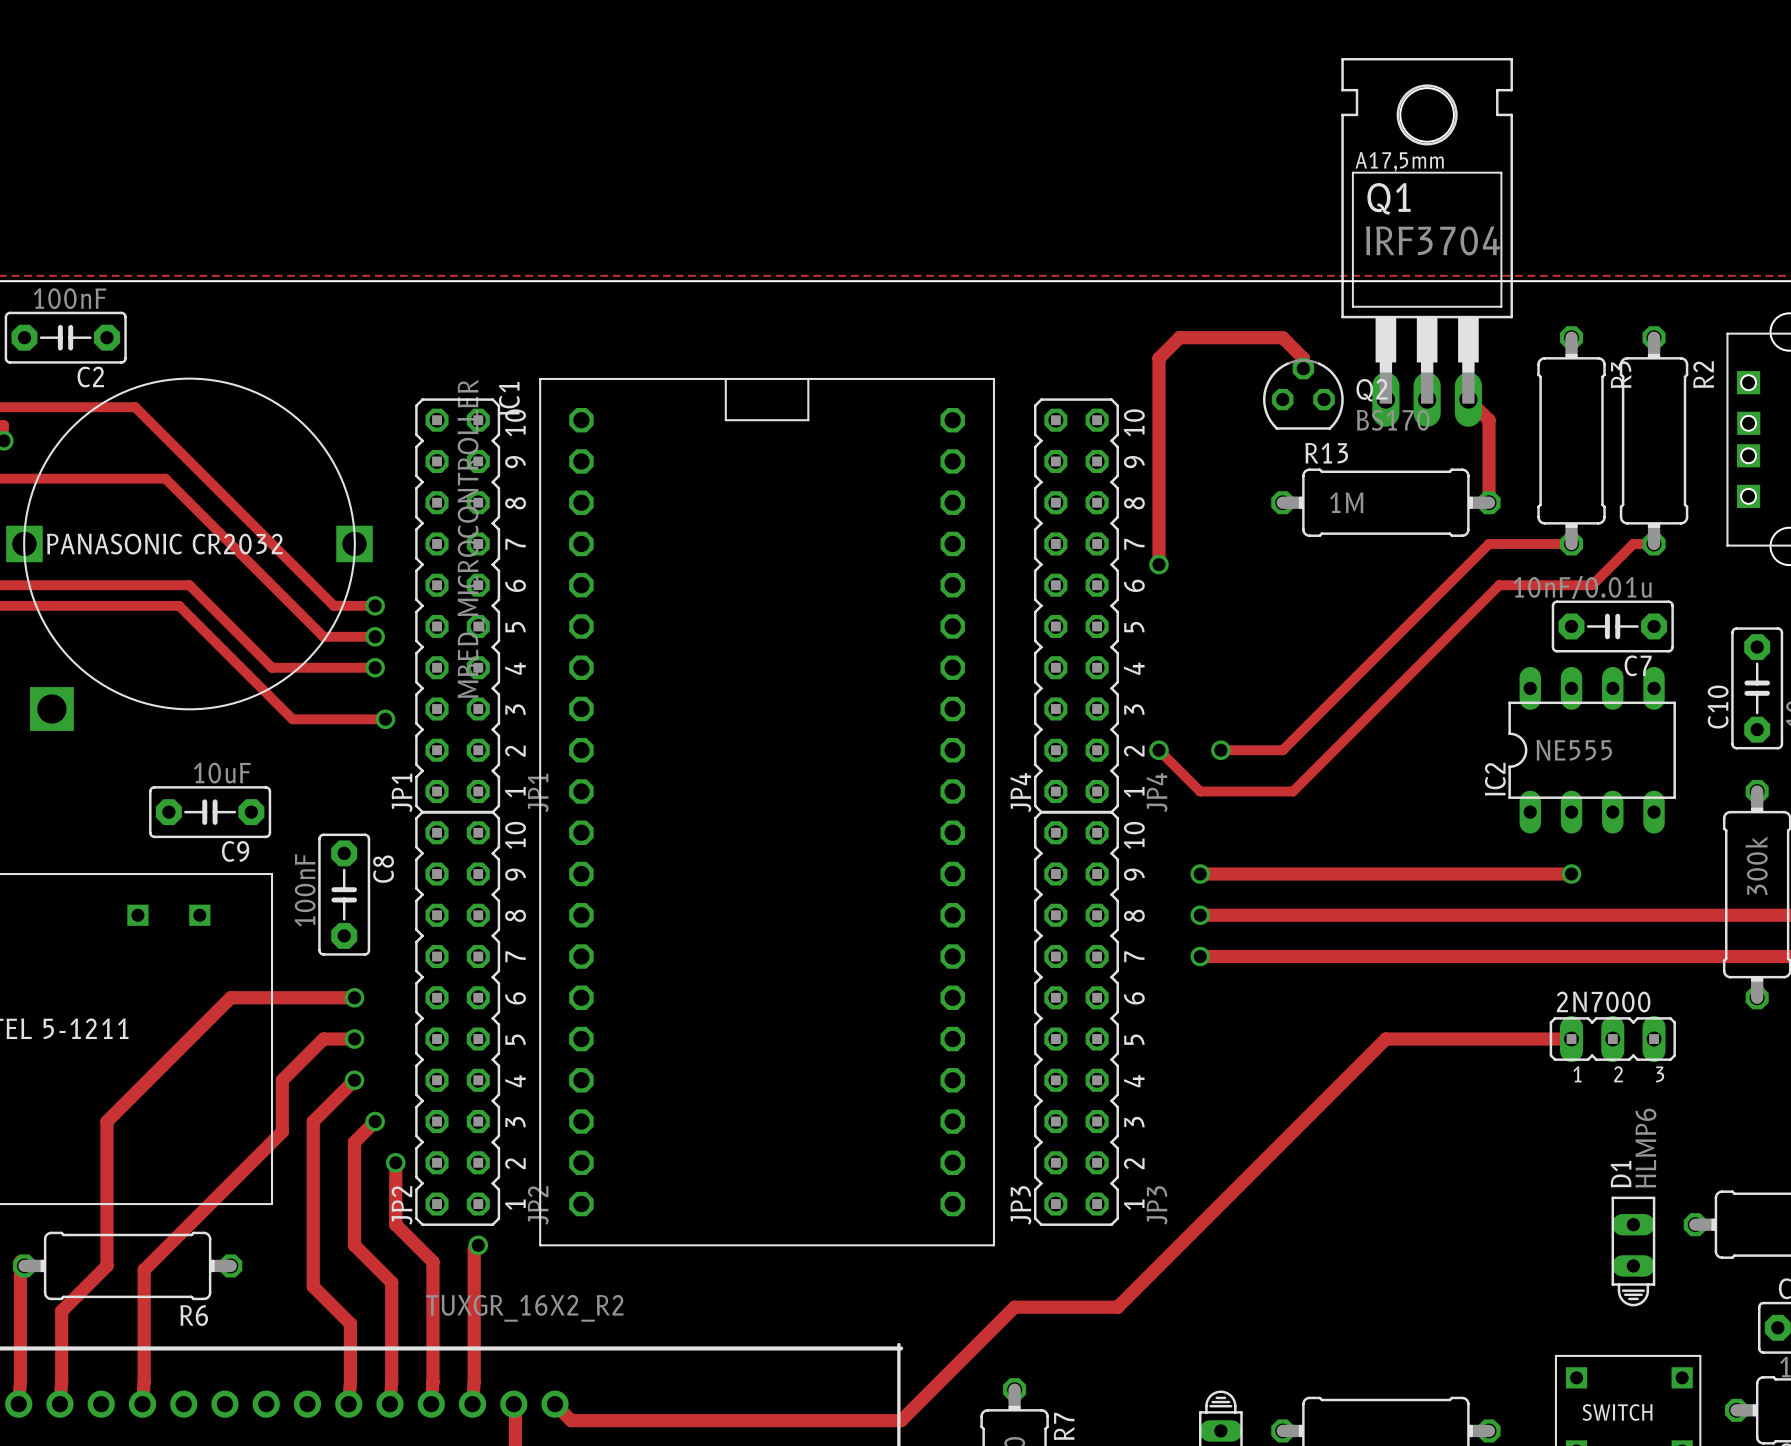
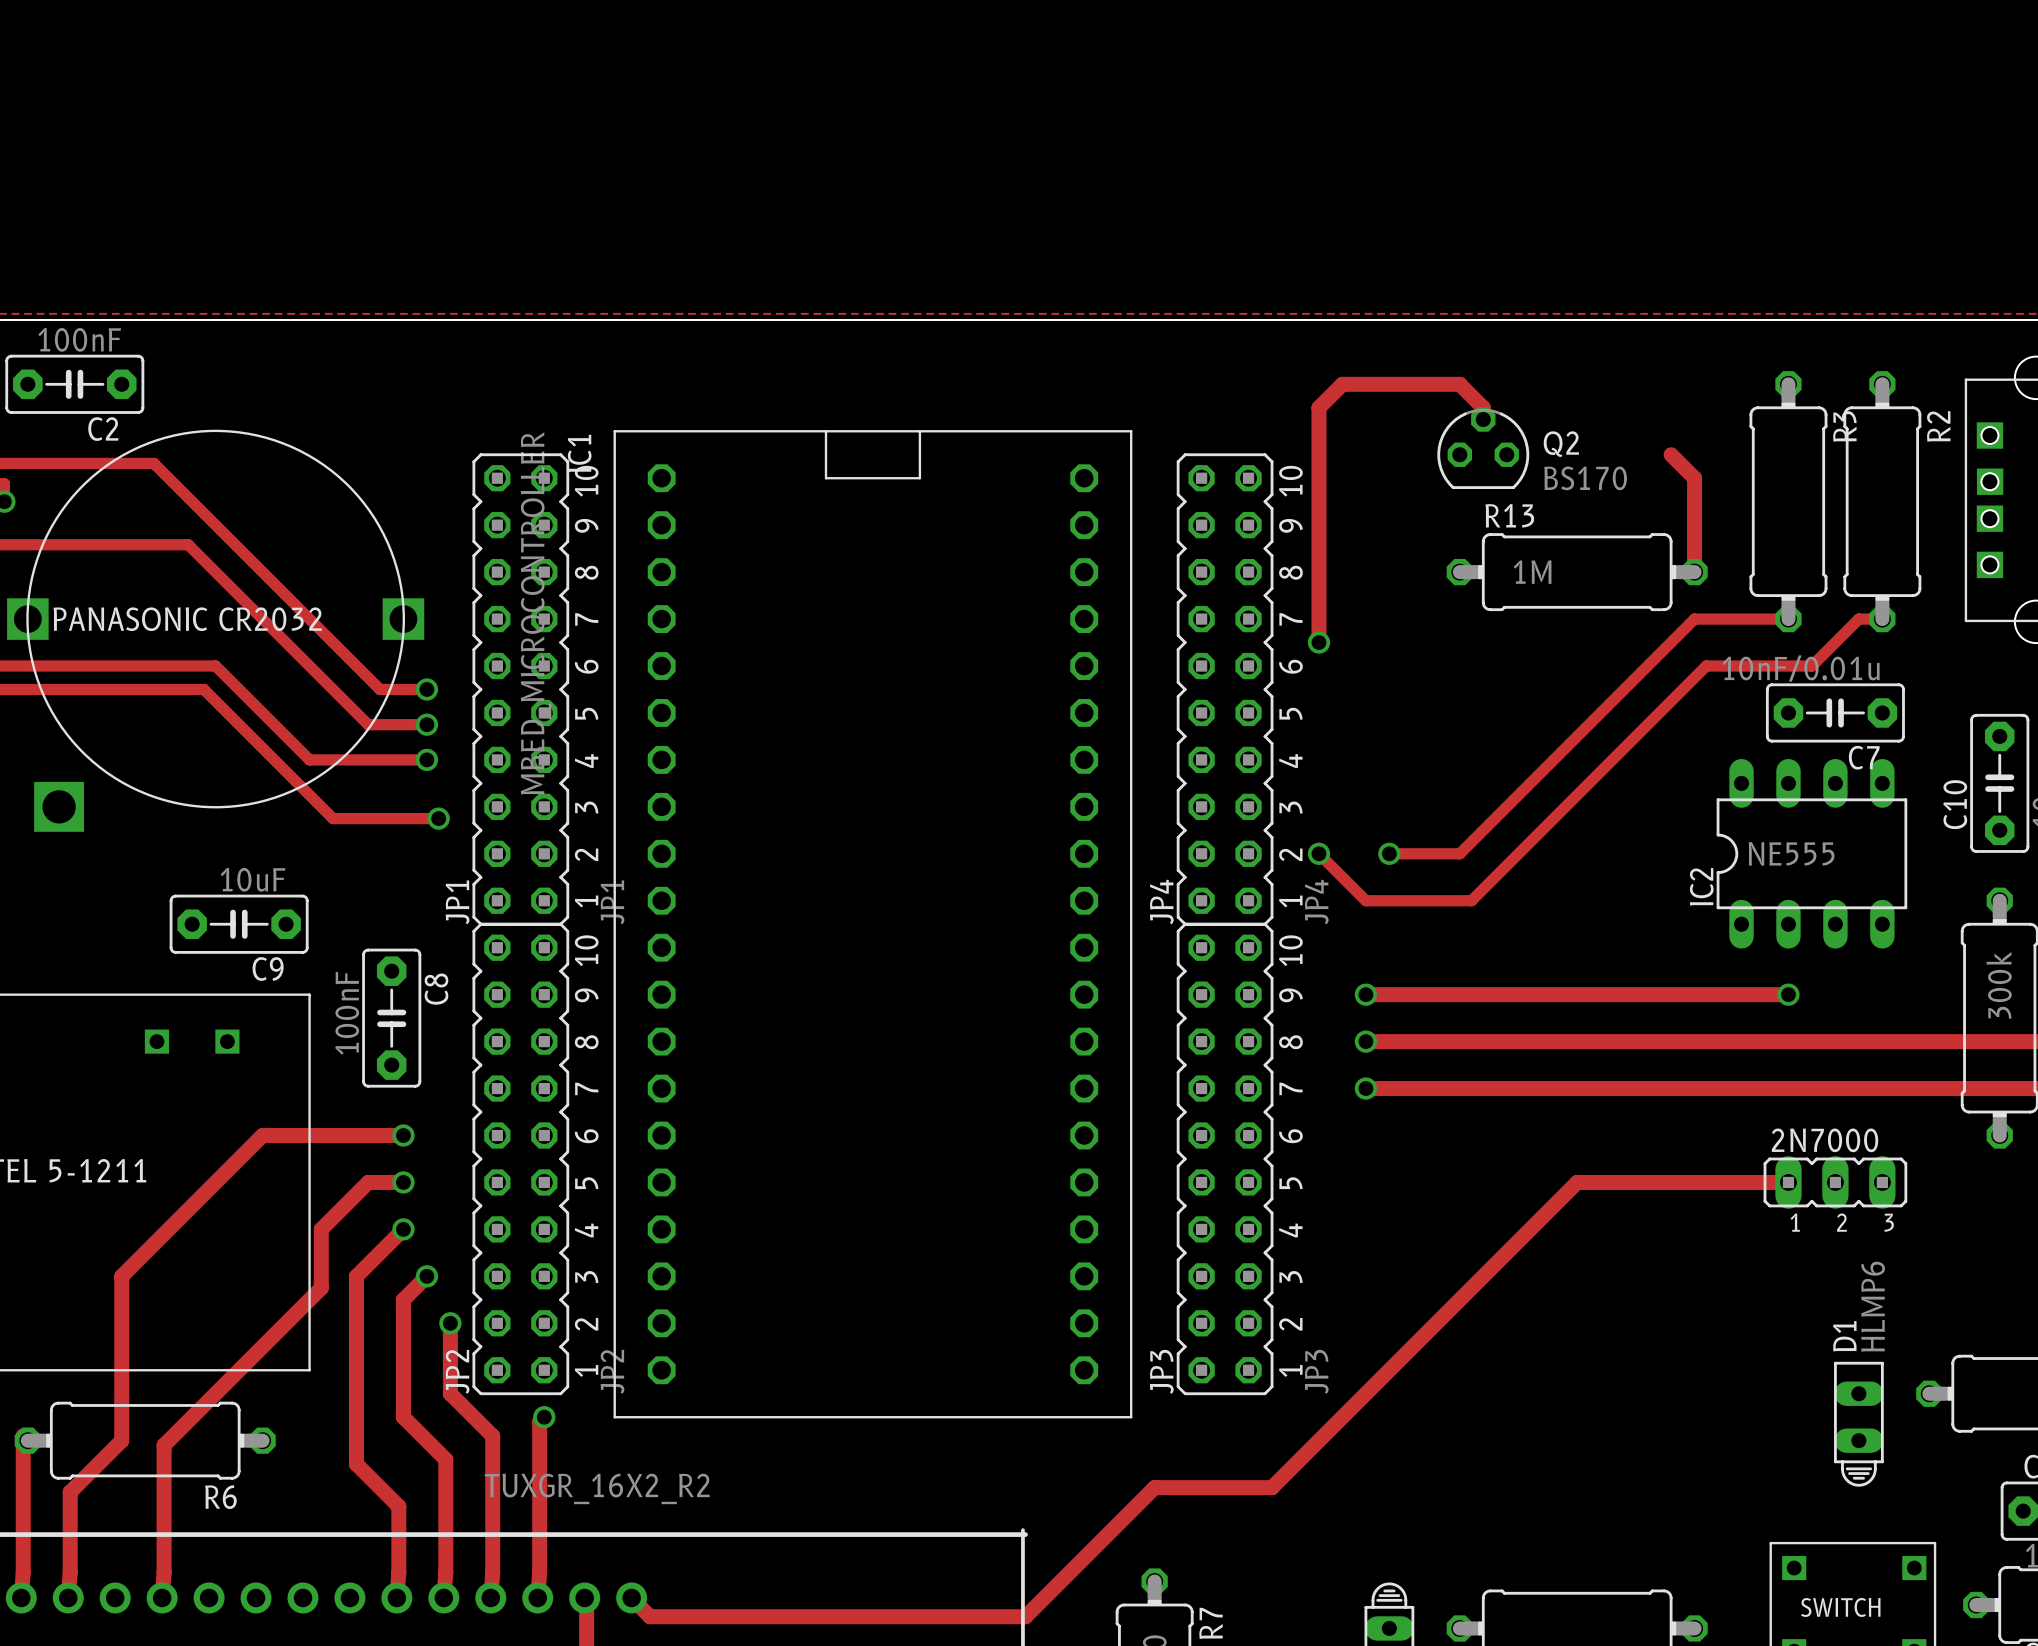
Q1: IRF3704 (1427, 242) -> none

